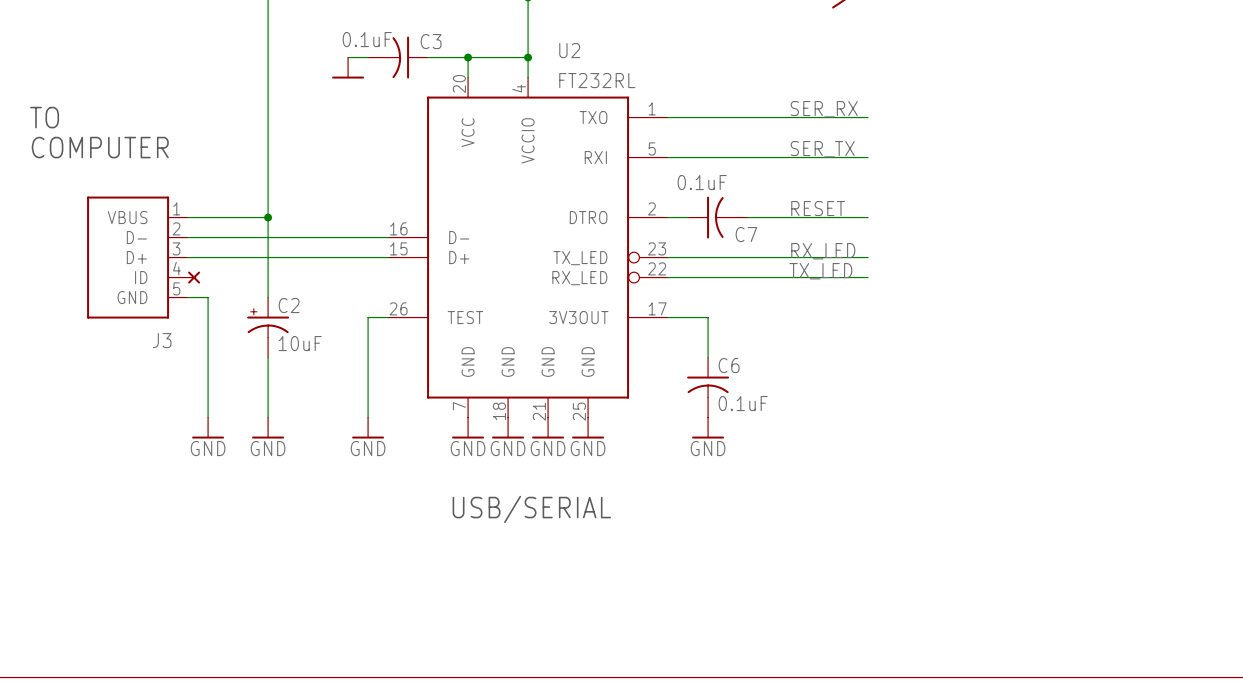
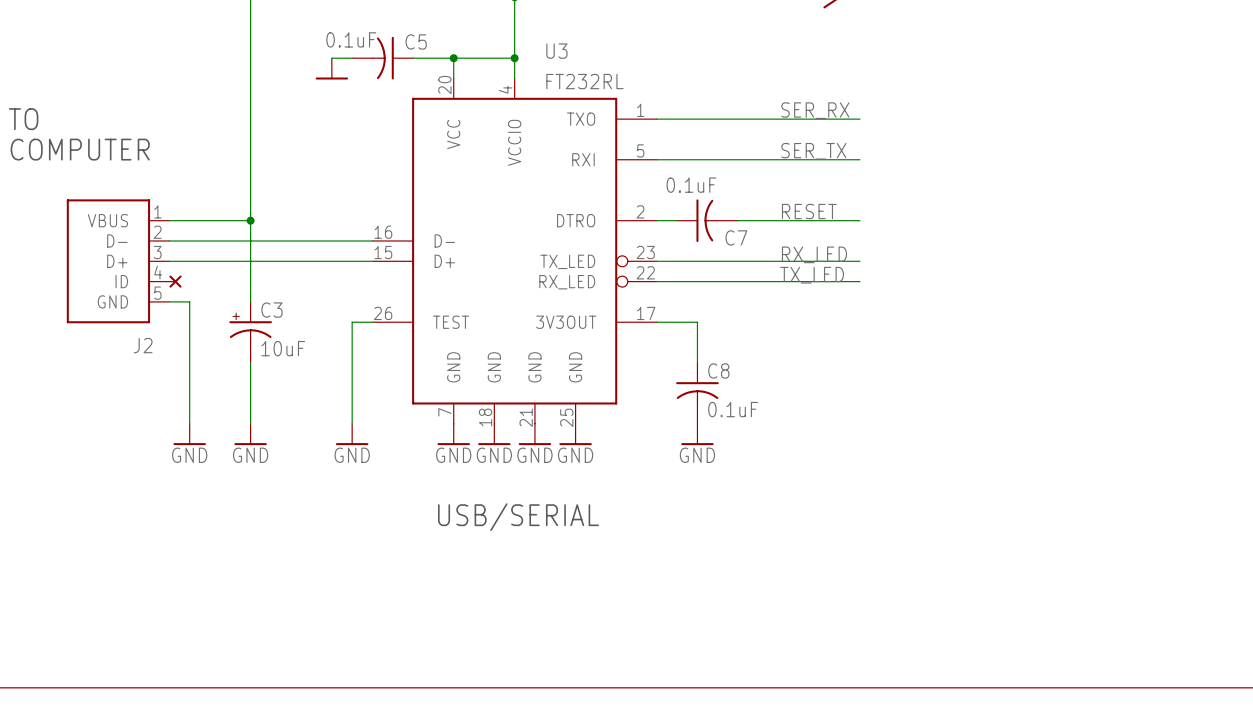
C3 name: C3 (431, 41) -> C5 (416, 41)
U2 name: U2 (569, 50) -> U3 (556, 51)
C2 name: C2 (289, 305) -> C3 (271, 310)
J3 name: J3 (162, 340) -> J2 (143, 345)
C6 name: C6 (729, 365) -> C8 (718, 370)

